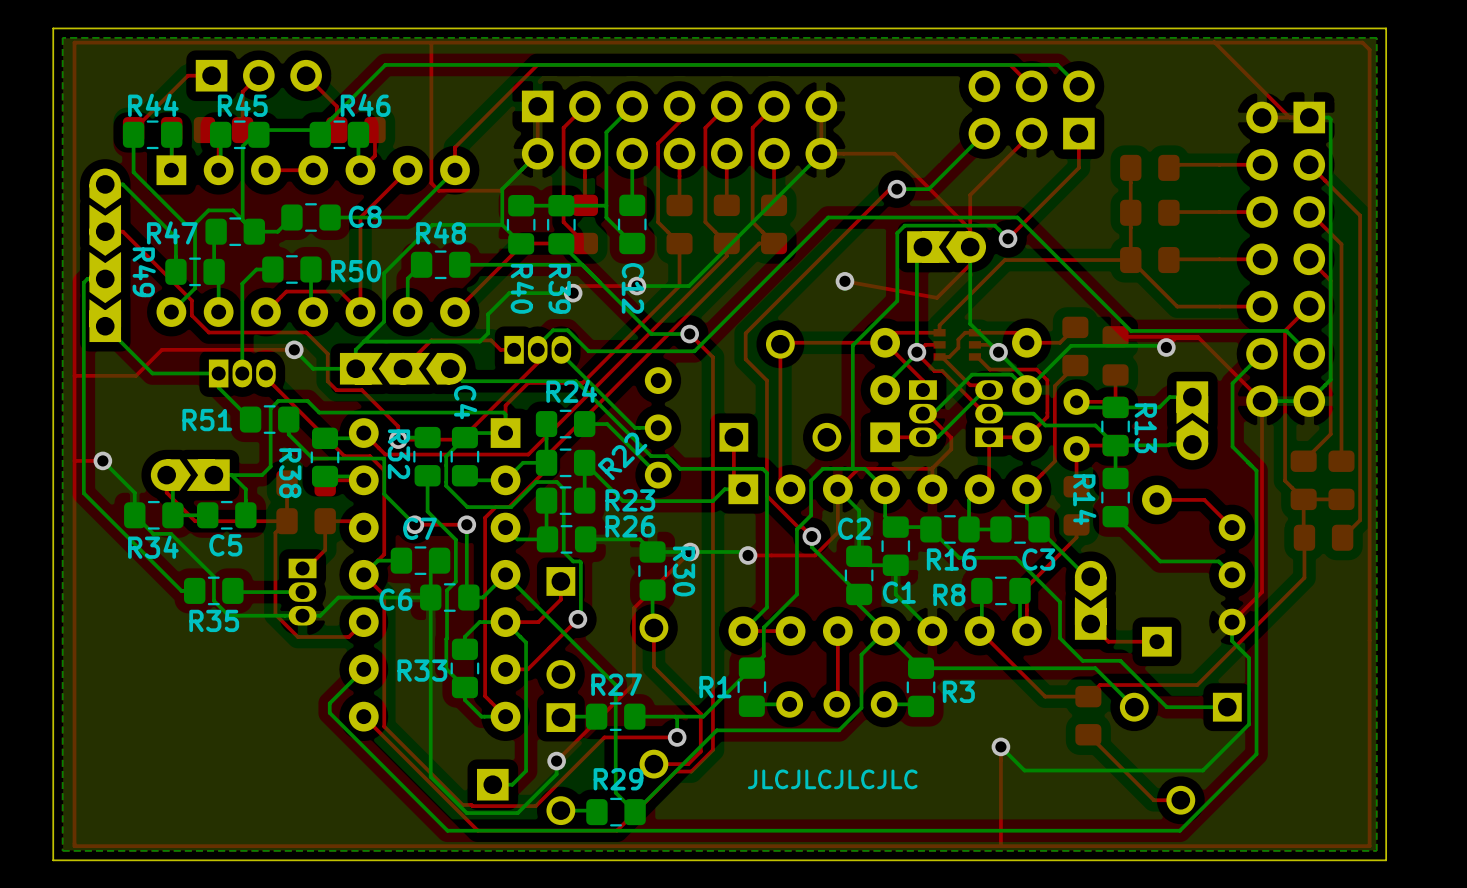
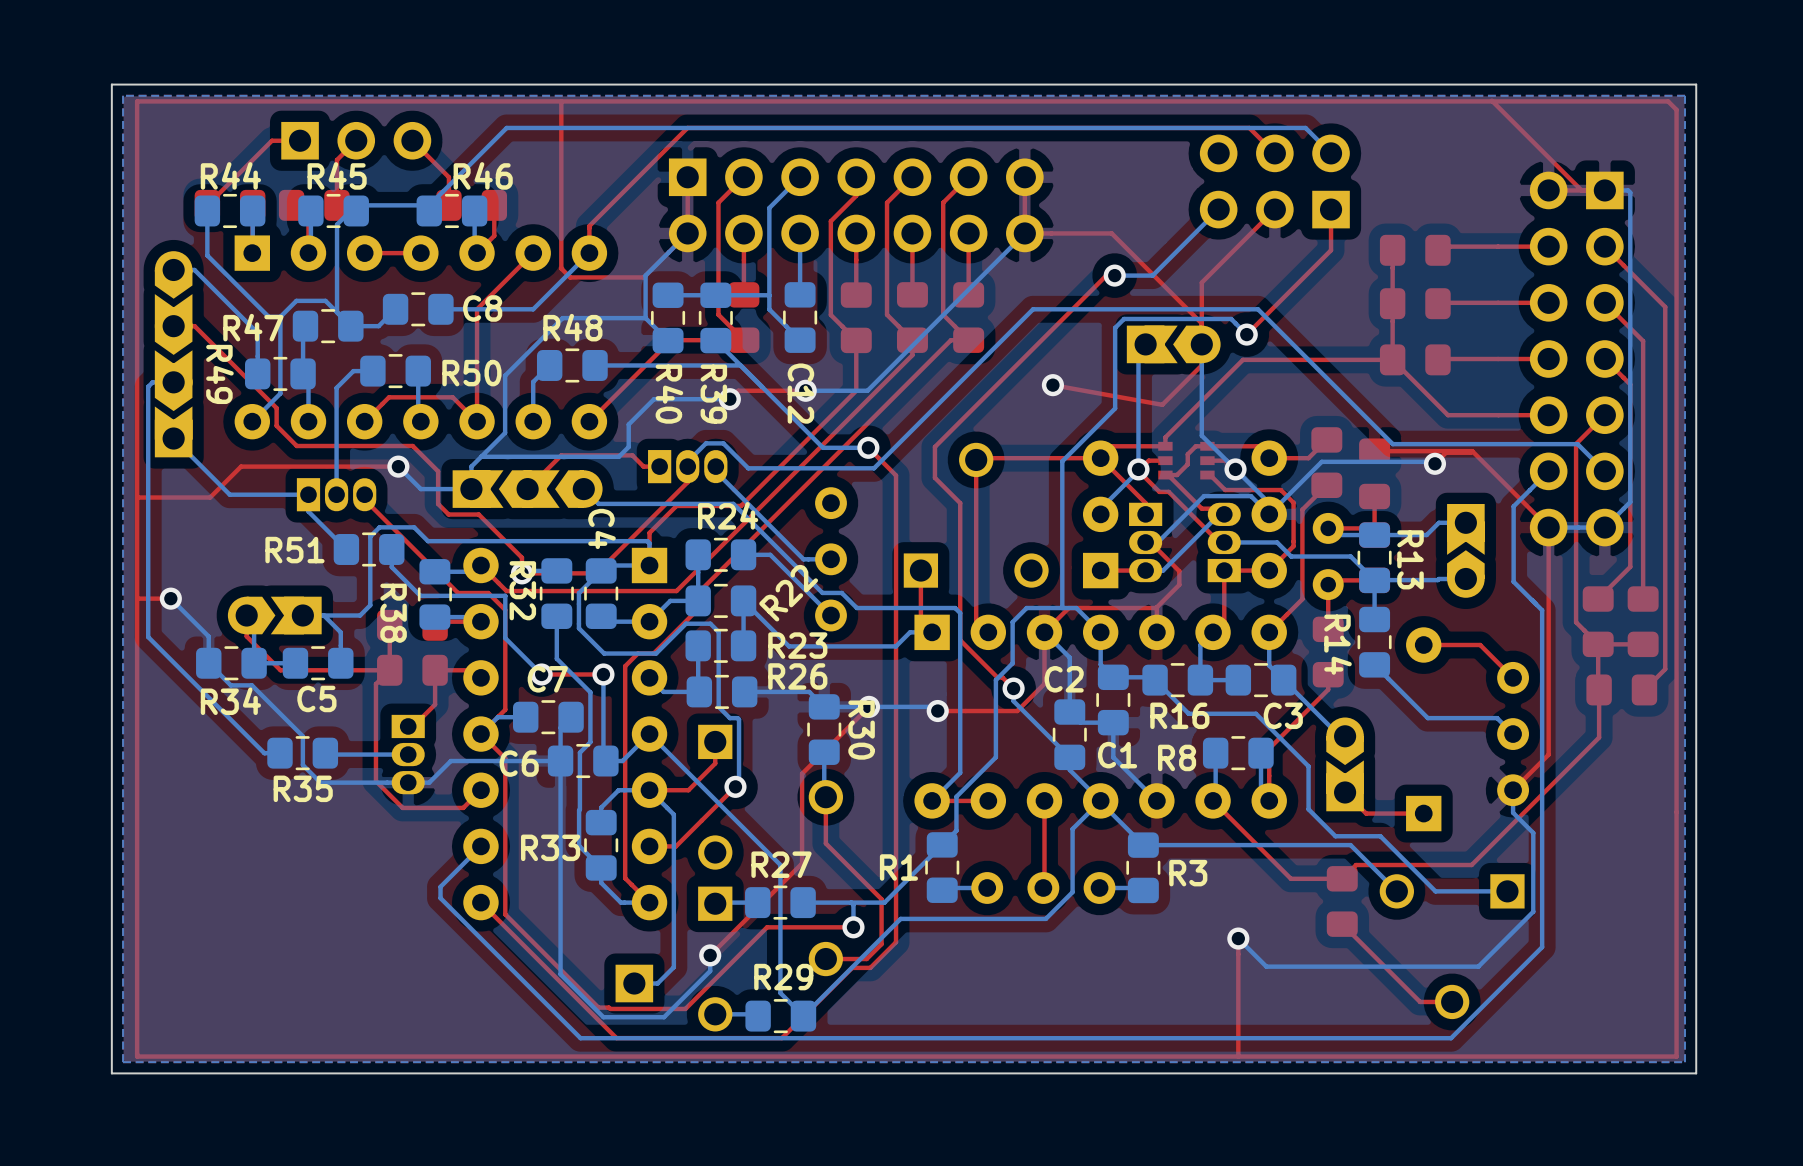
text: JLCJLCJLCJLC (832, 779) -> none

